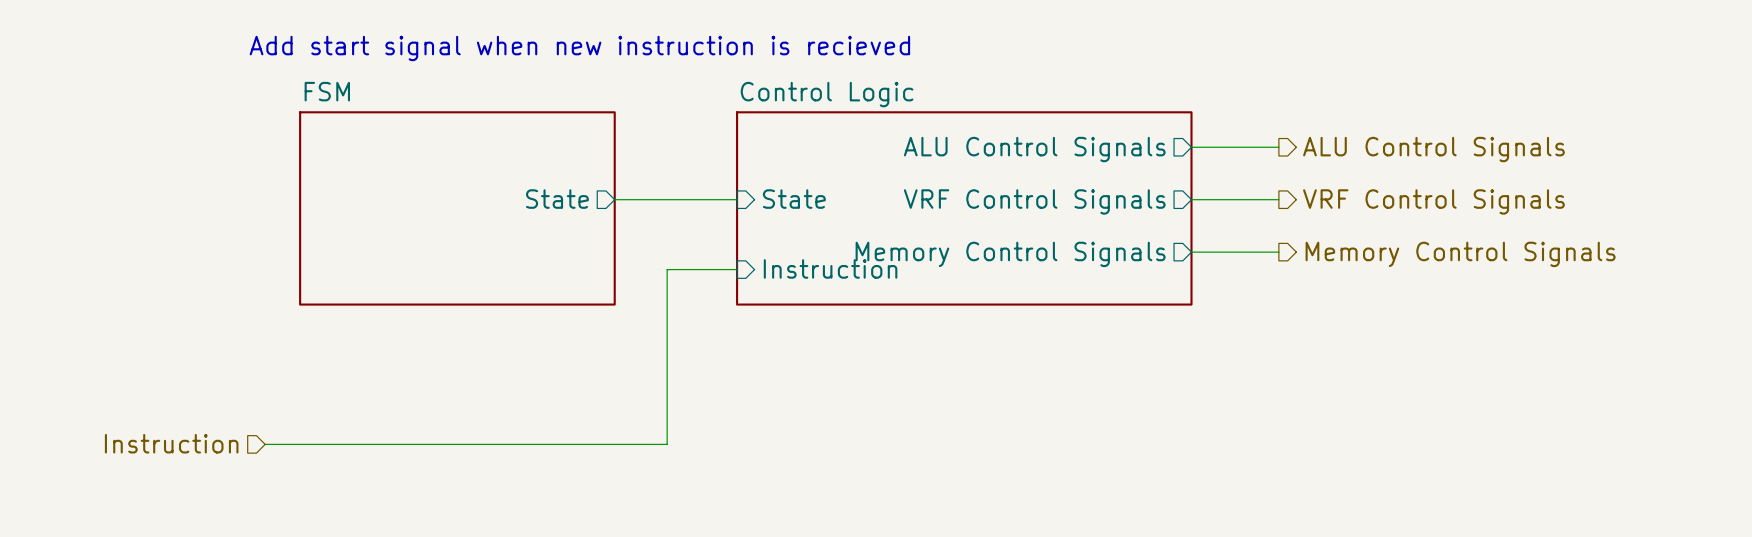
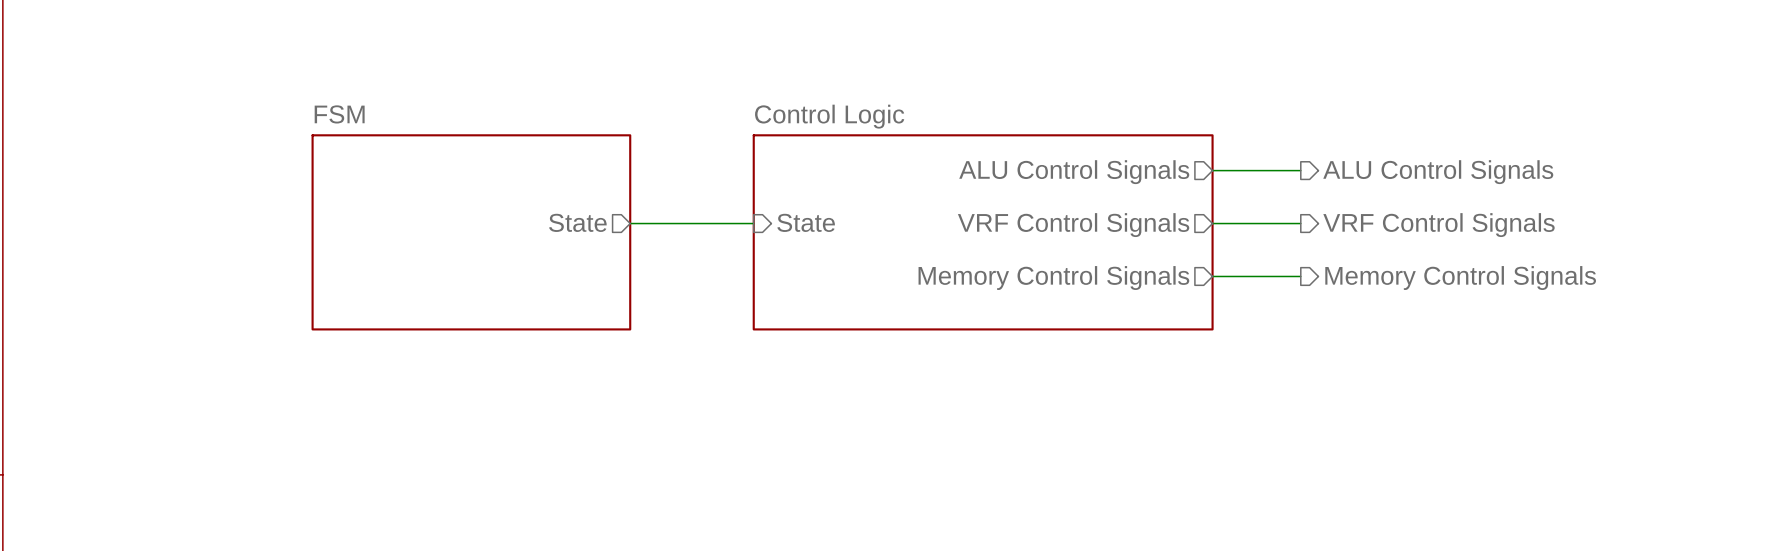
text: Add start signal when new instruction is recieved (579, 48) -> none
sheet pin: Instruction (830, 268) -> none
wire: (737, 269) (667, 269) (667, 444) (265, 444) -> none
hierarchical label: Instruction (171, 443) -> none

